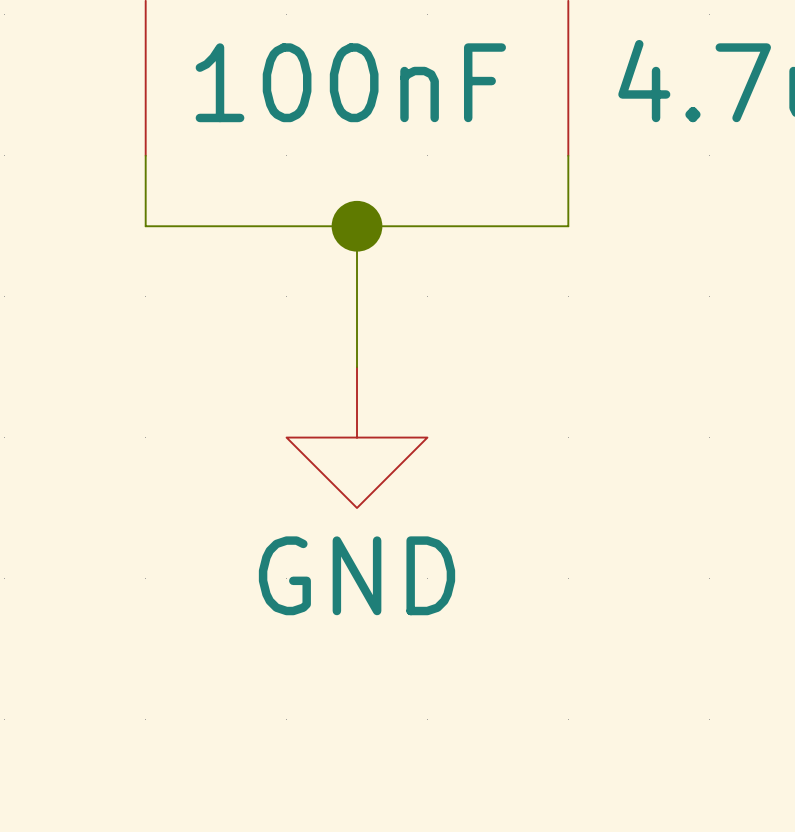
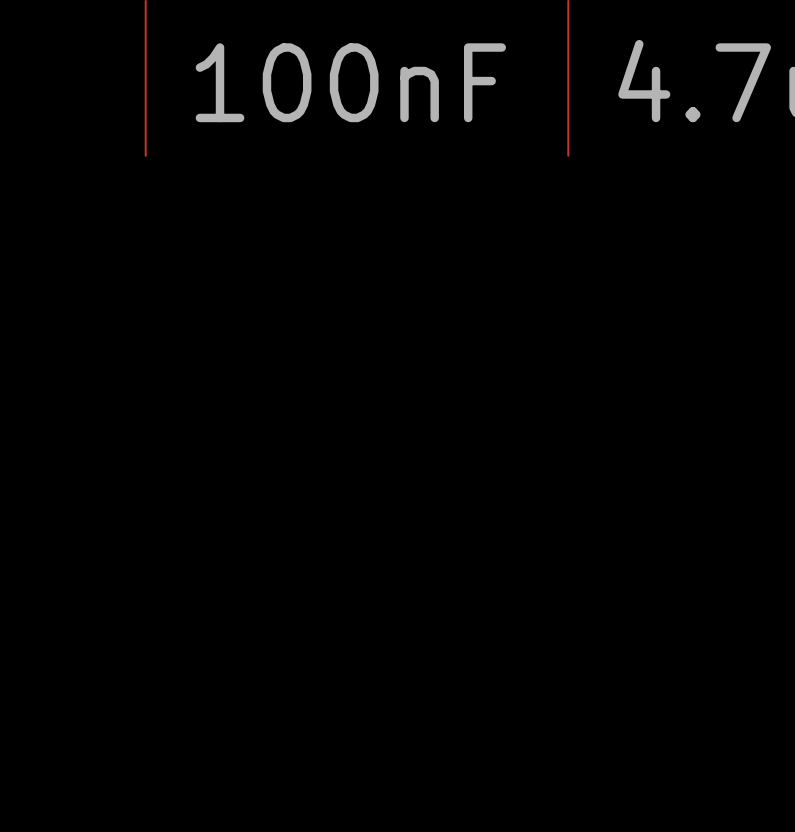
wire: (145, 155) (145, 226) (568, 226) (568, 155) -> none
wire: (357, 226) (357, 367) -> none
junction: (357, 226) -> none
power symbol: GND (357, 437) -> none

